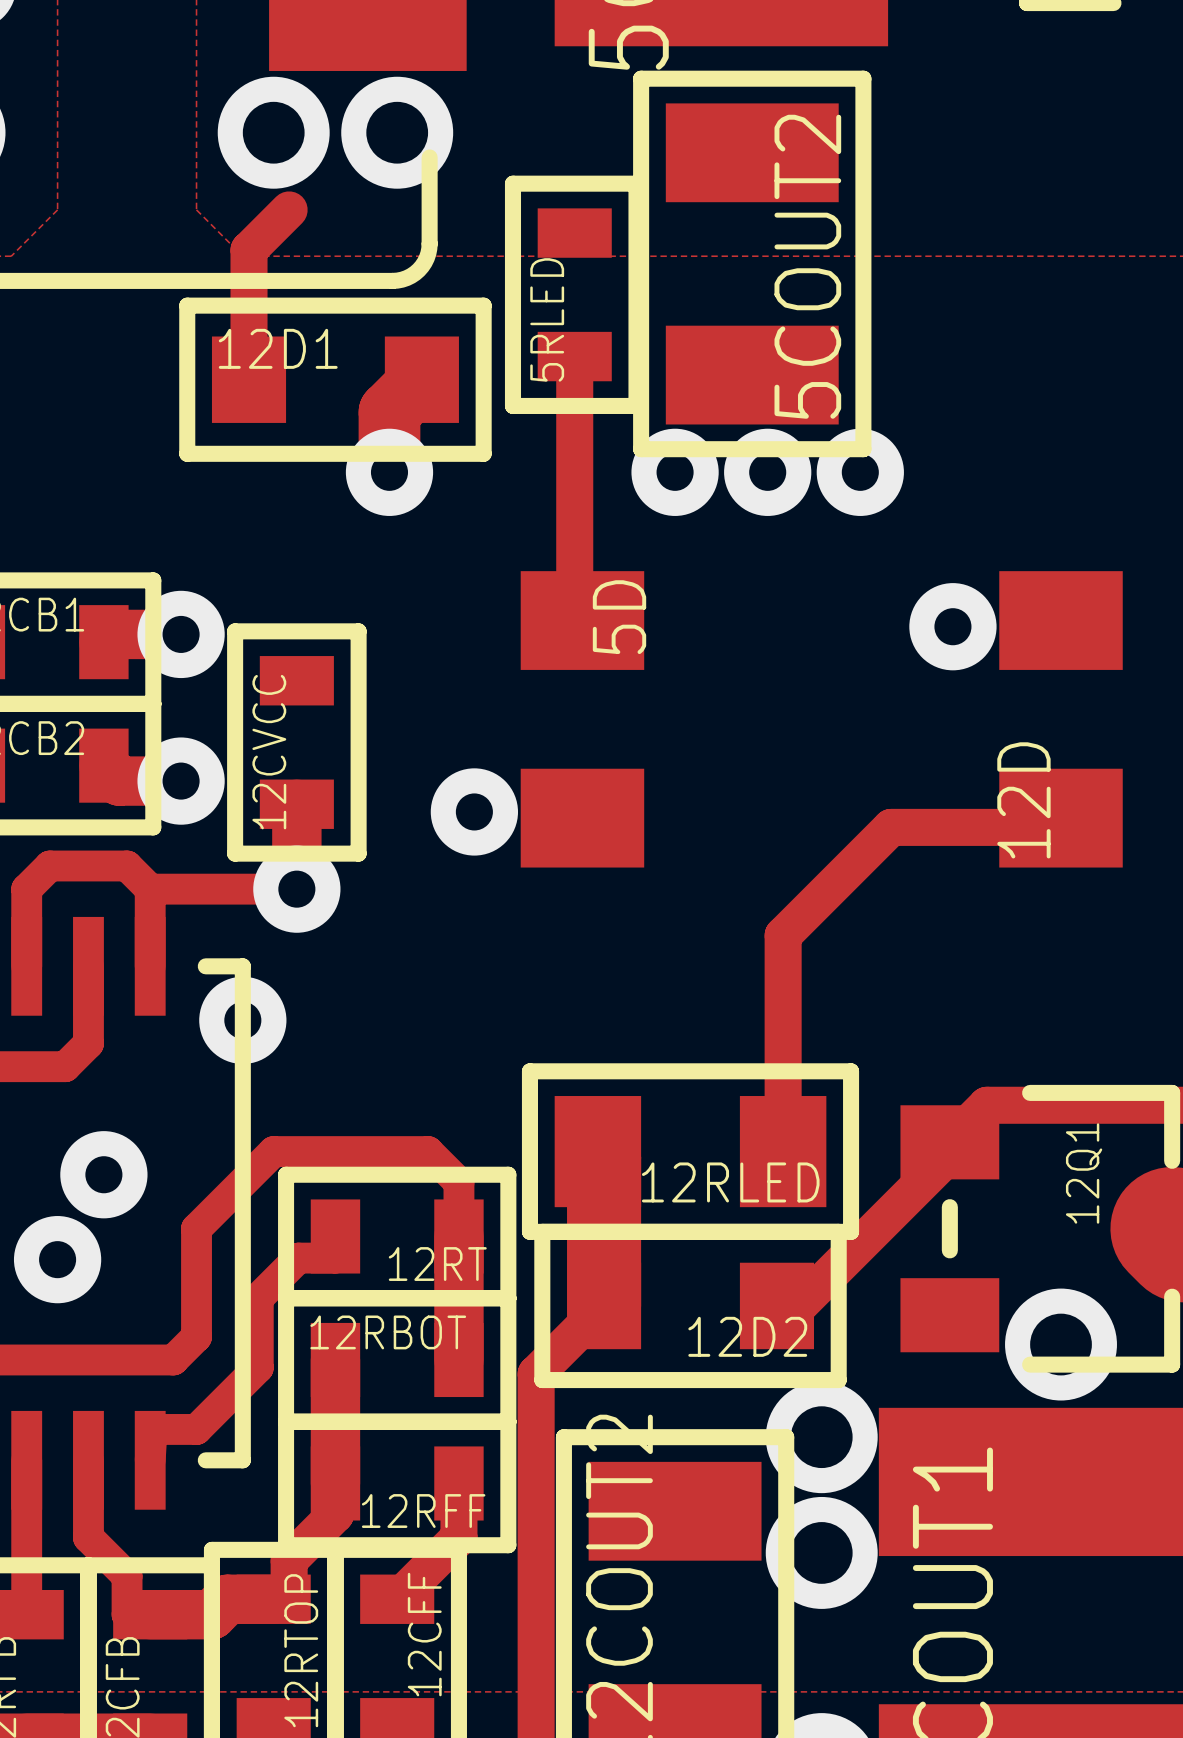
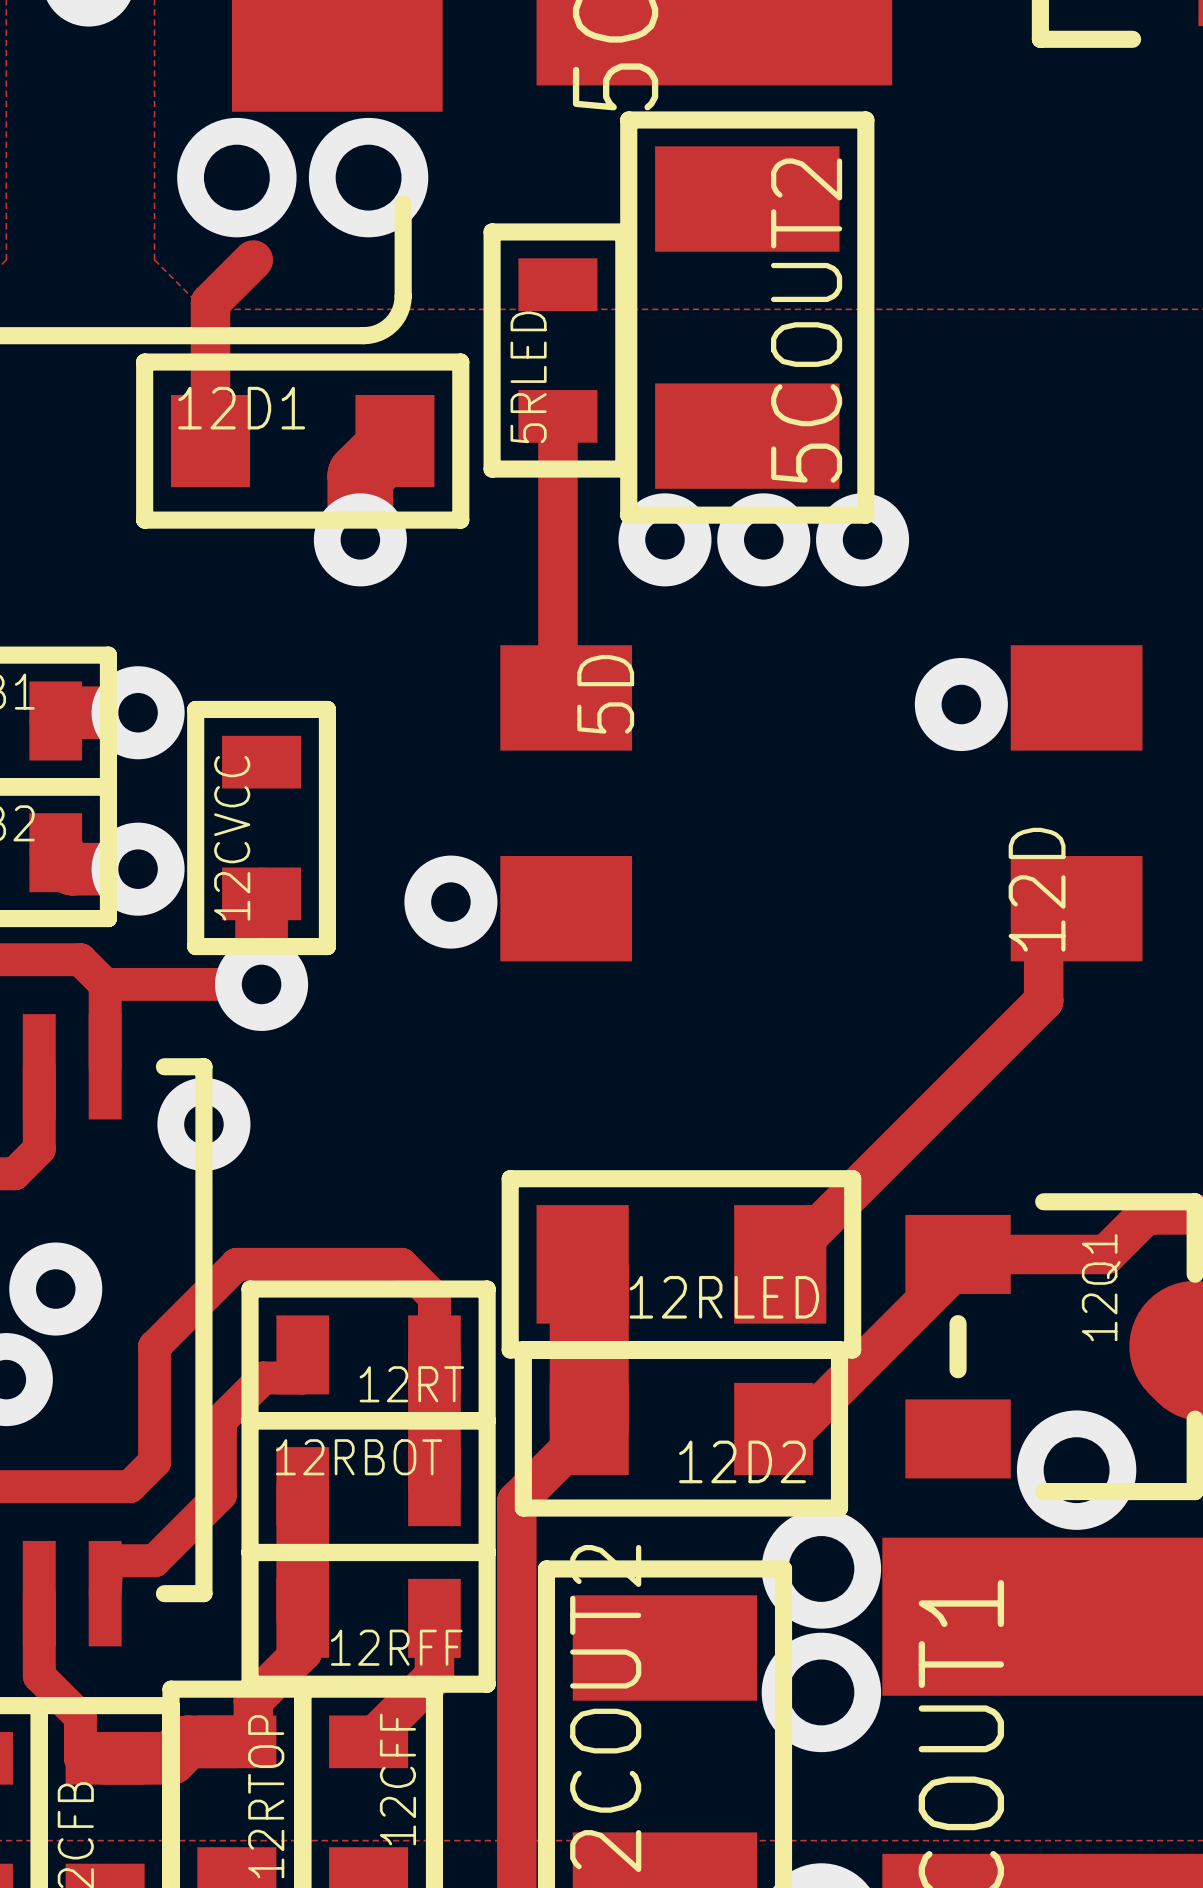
track: (1051, 827) (891, 827) (783, 935) (783, 1151) -> (1066, 918) (1043, 941) (1043, 1000) (780, 1264)
track: (1125, 1105) (986, 1105) (949, 1142) -> (1145, 1214) (1106, 1254) (958, 1254)

